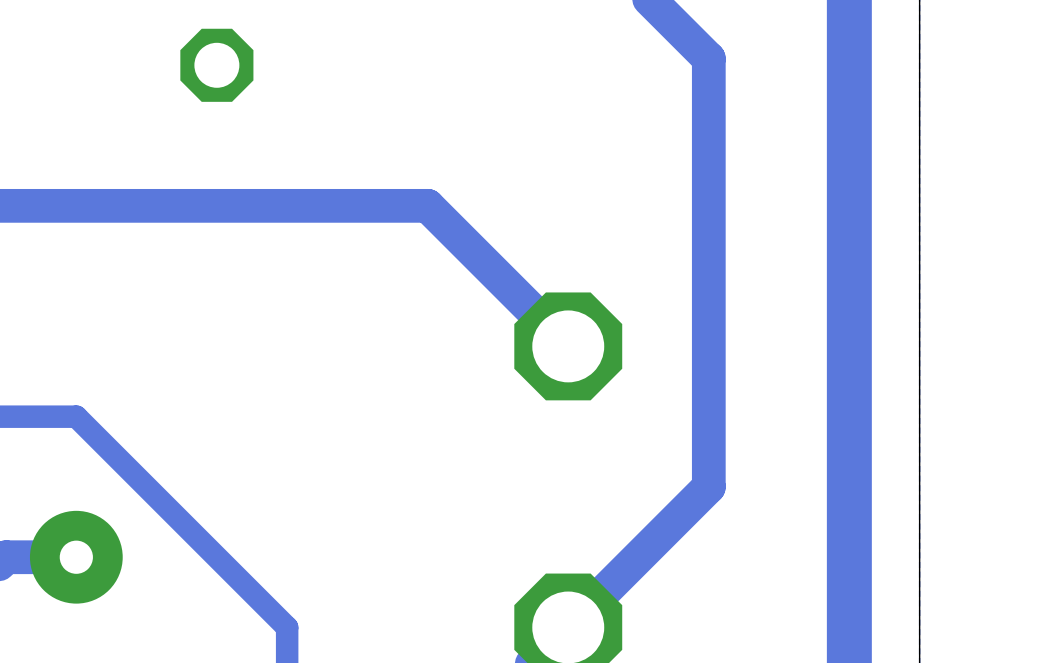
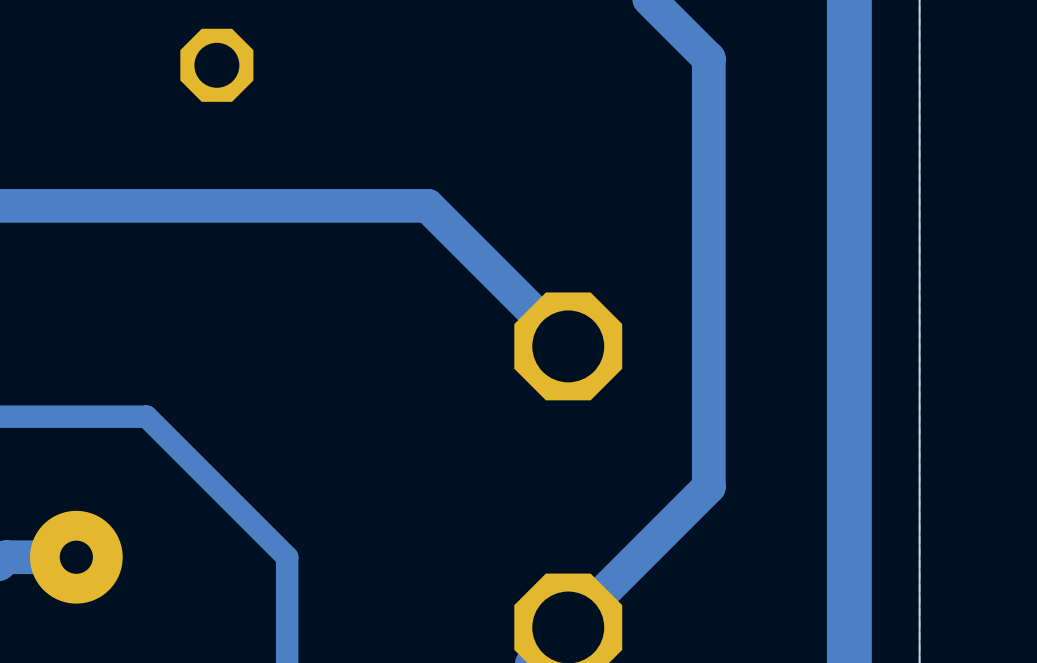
bottom track: (76, 416) (287, 627) -> (76, 416) (146, 416) (287, 557) (287, 627)

